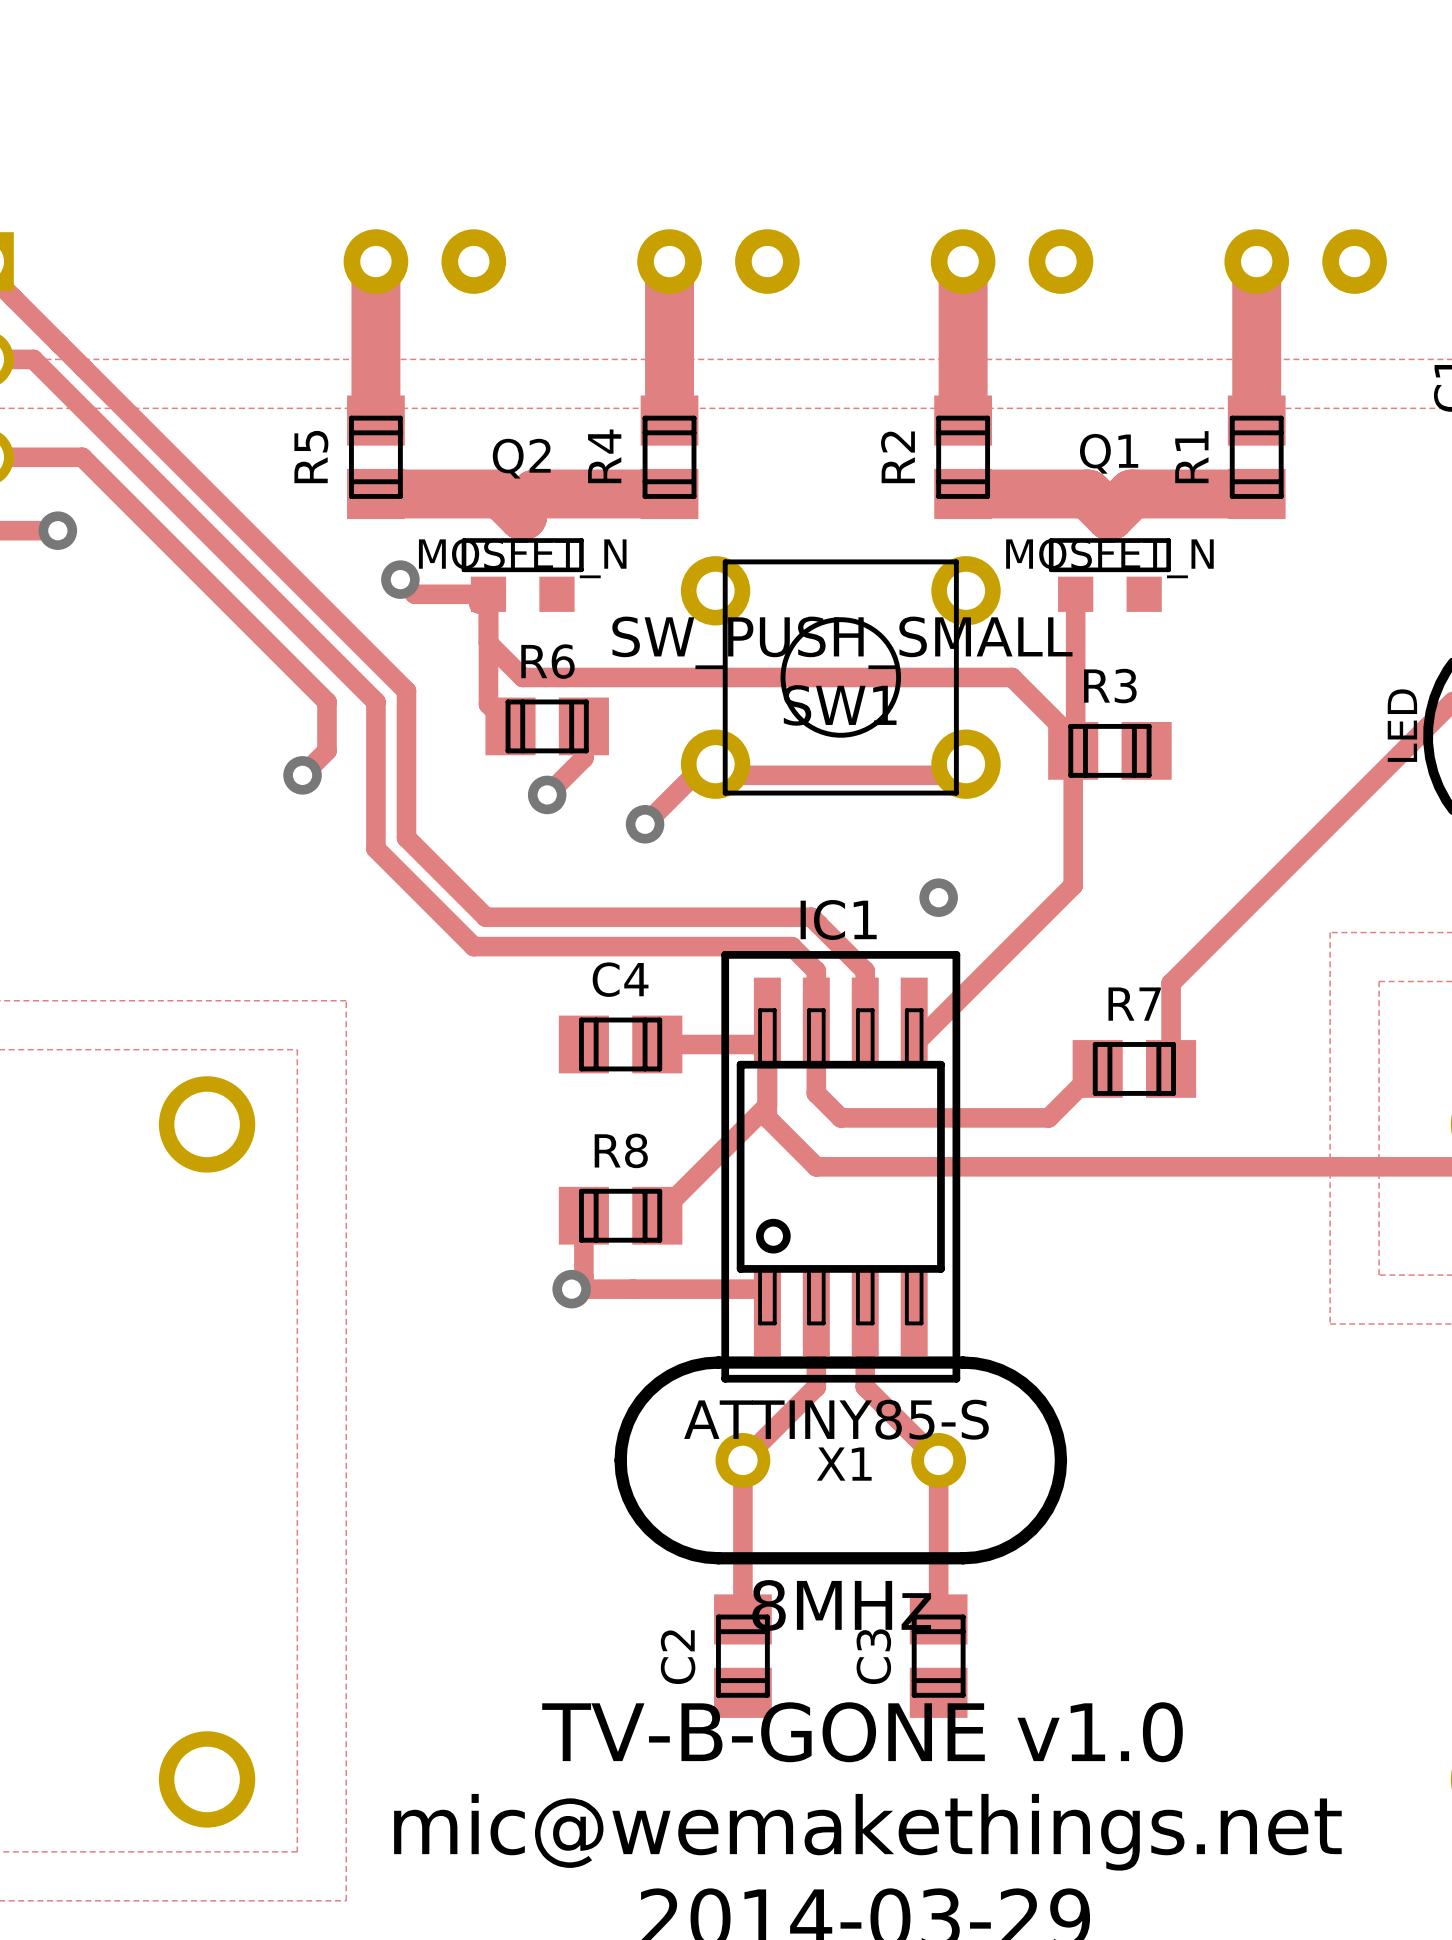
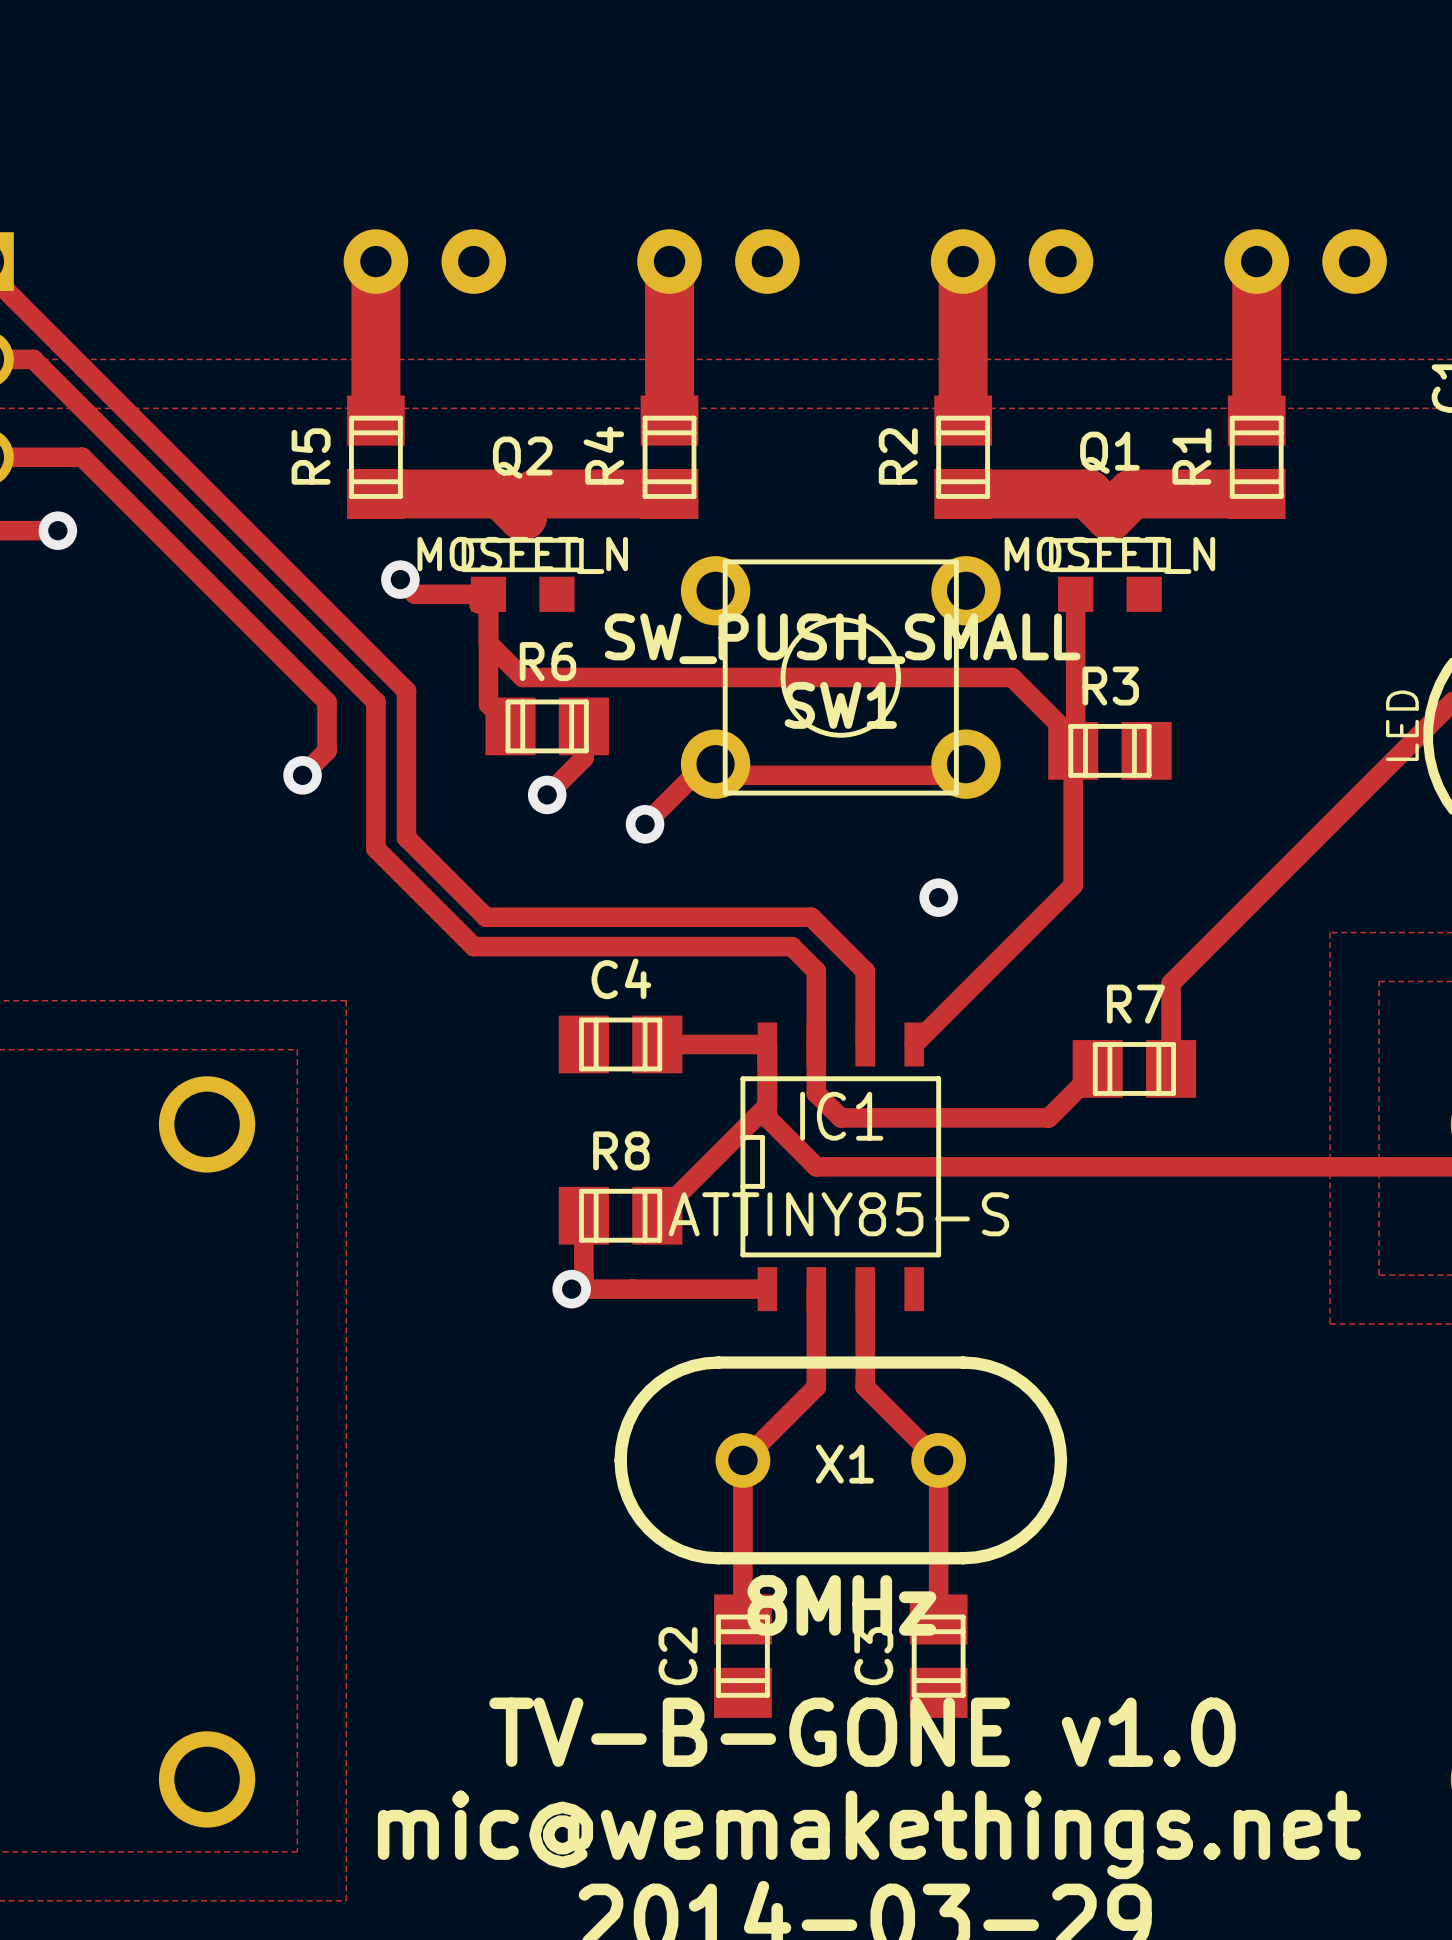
IC1 name position: IC1 (838, 919) -> IC1 (841, 1116)
IC1 footprint: [721, 951, 961, 1383] -> [740, 1022, 942, 1312]
IC1 value position: ATTINY85-S (836, 1419) -> ATTINY85-S (838, 1214)

